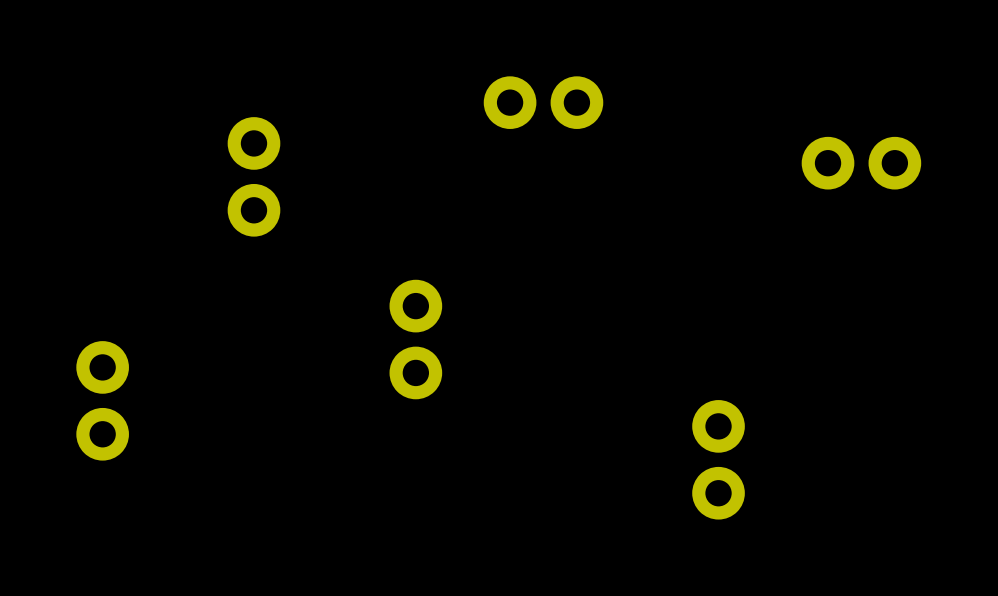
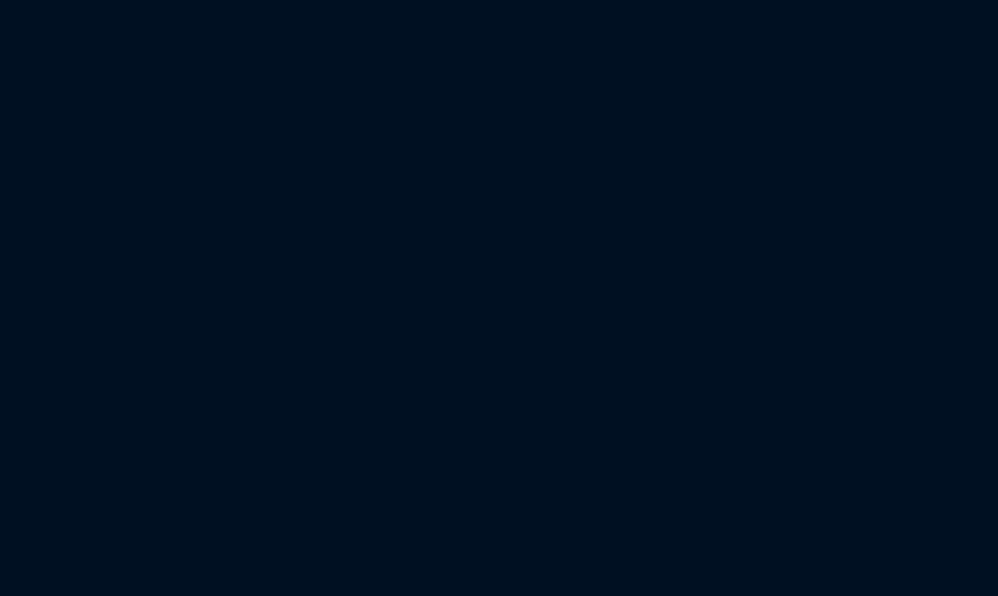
part: (543, 102) -> none
part: (861, 163) -> none
part: (253, 176) -> none
part: (415, 339) -> none
part: (102, 400) -> none
part: (718, 459) -> none

